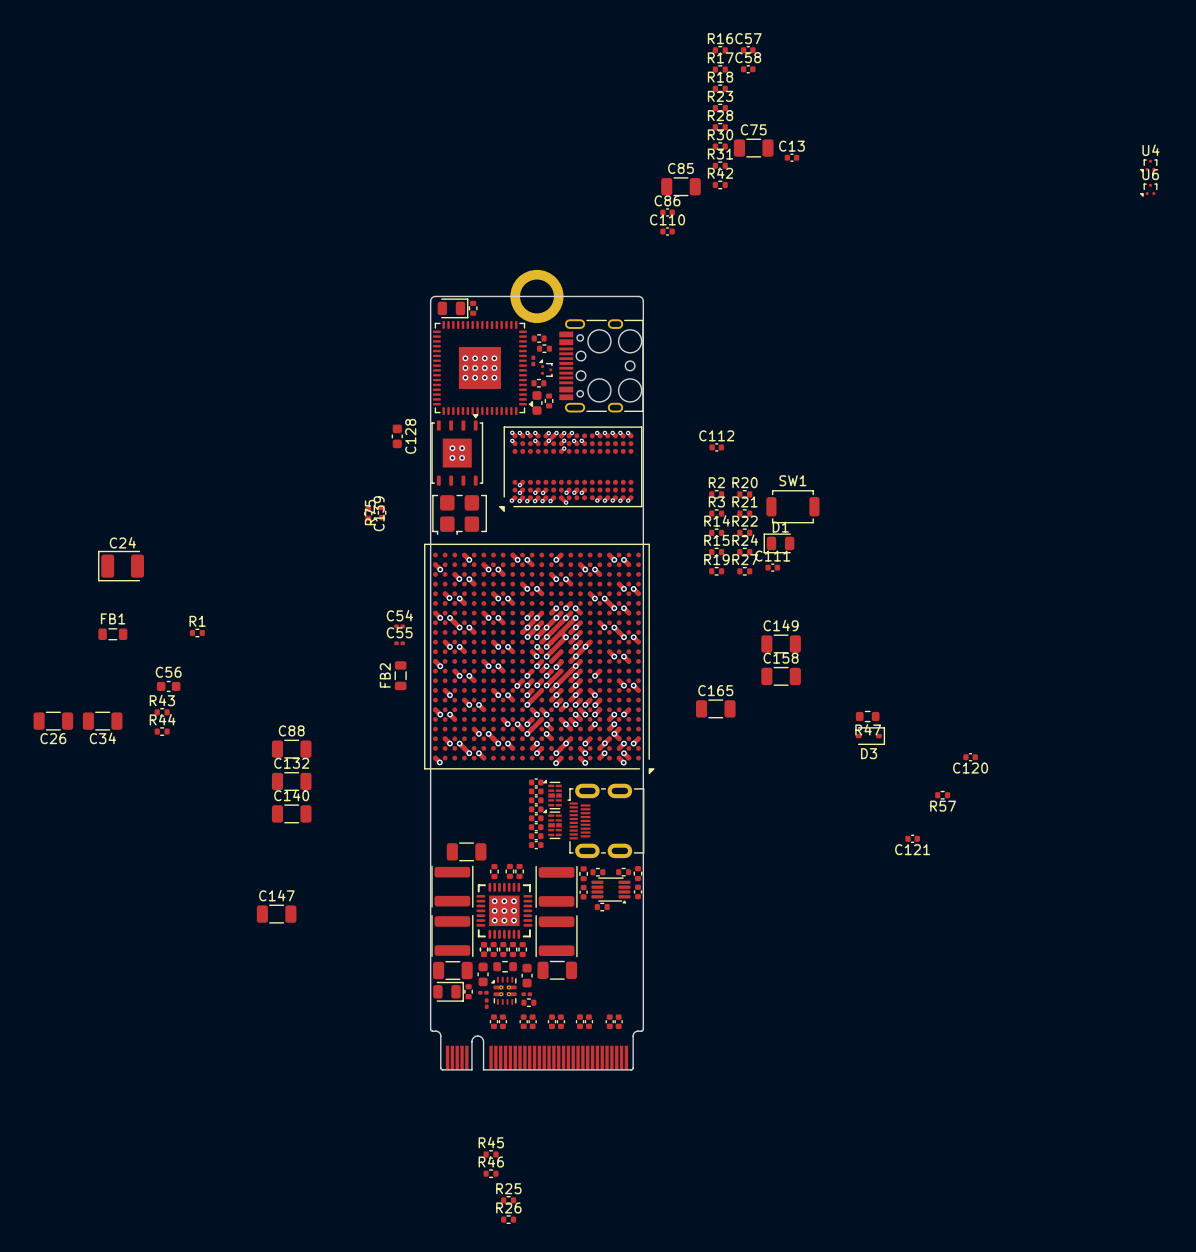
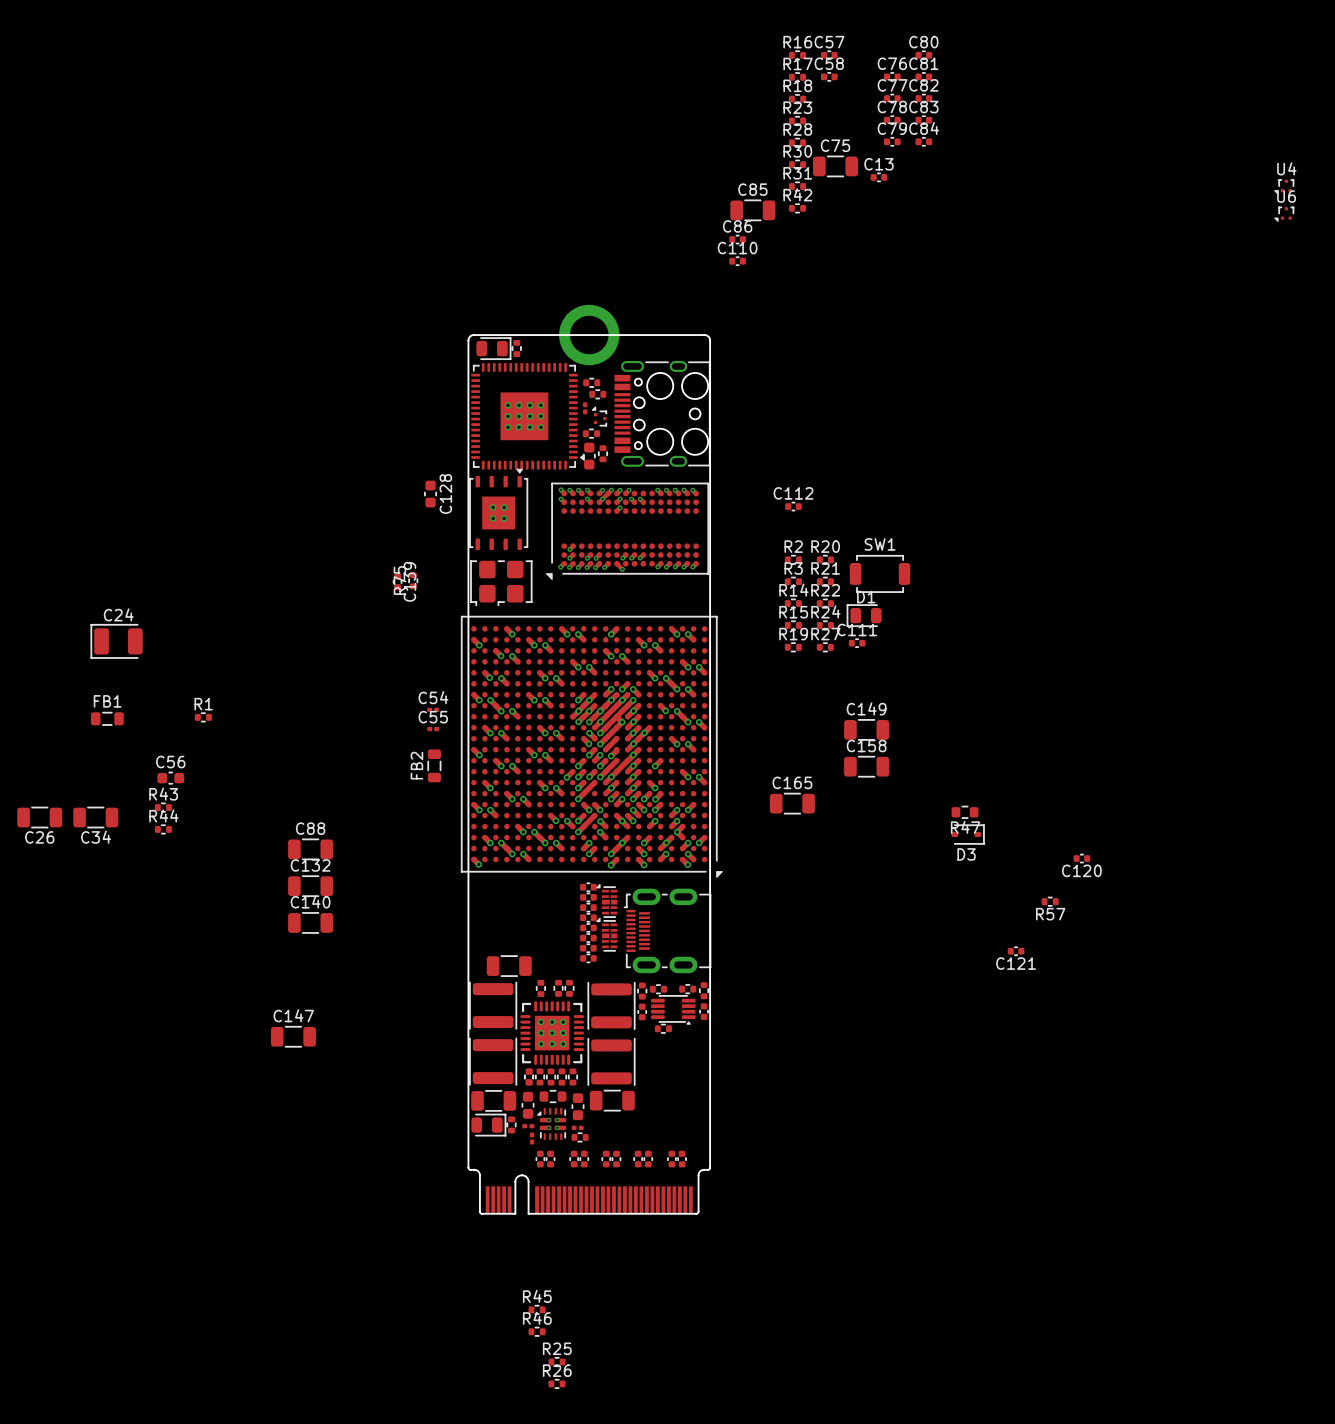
C80: none -> (923, 55)
C76: none -> (892, 76)
C81: none -> (923, 76)
C77: none -> (892, 98)
C82: none -> (923, 98)
C78: none -> (892, 120)
C83: none -> (923, 120)
C79: none -> (892, 141)
C84: none -> (923, 141)

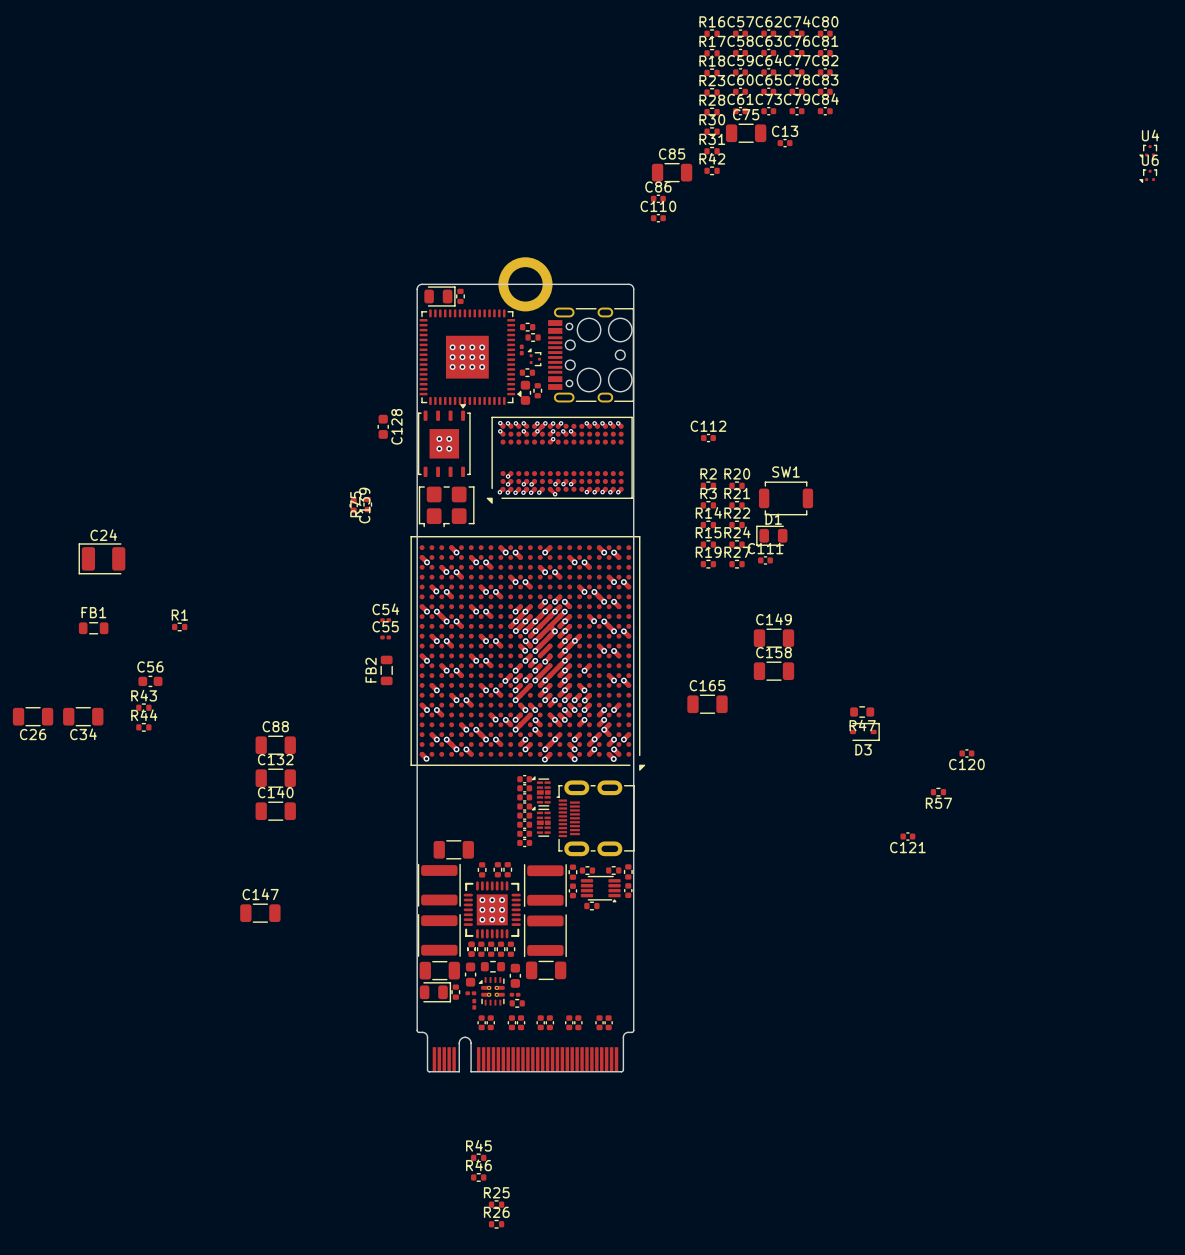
C62: none -> (768, 33)
C74: none -> (797, 33)
C63: none -> (768, 53)
C59: none -> (740, 72)
C64: none -> (768, 72)
C60: none -> (740, 91)
C65: none -> (768, 91)
C61: none -> (740, 111)
C73: none -> (768, 111)

